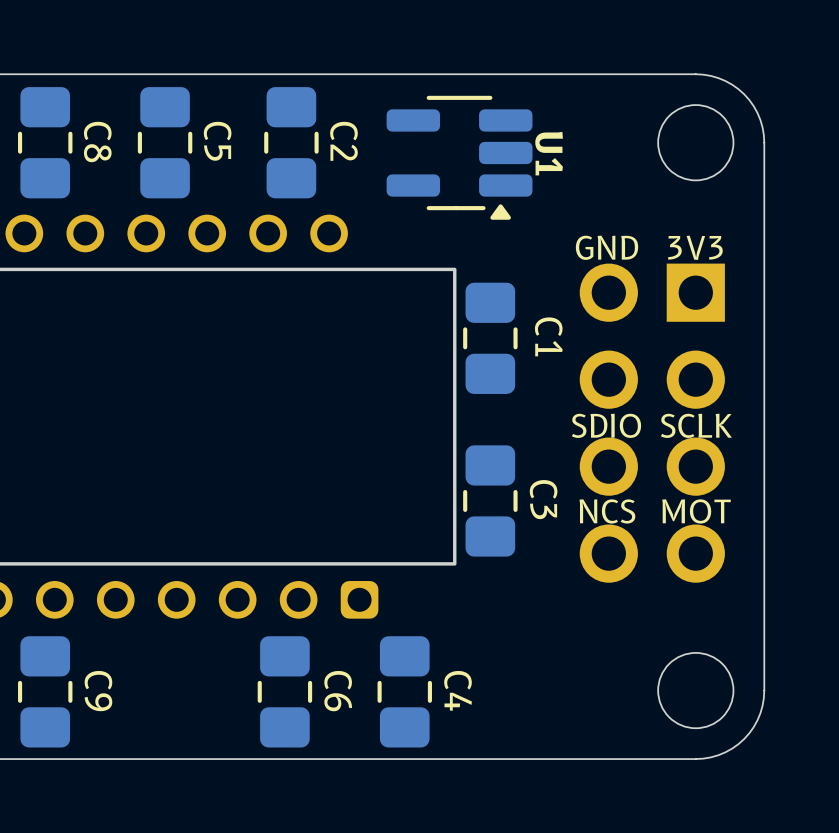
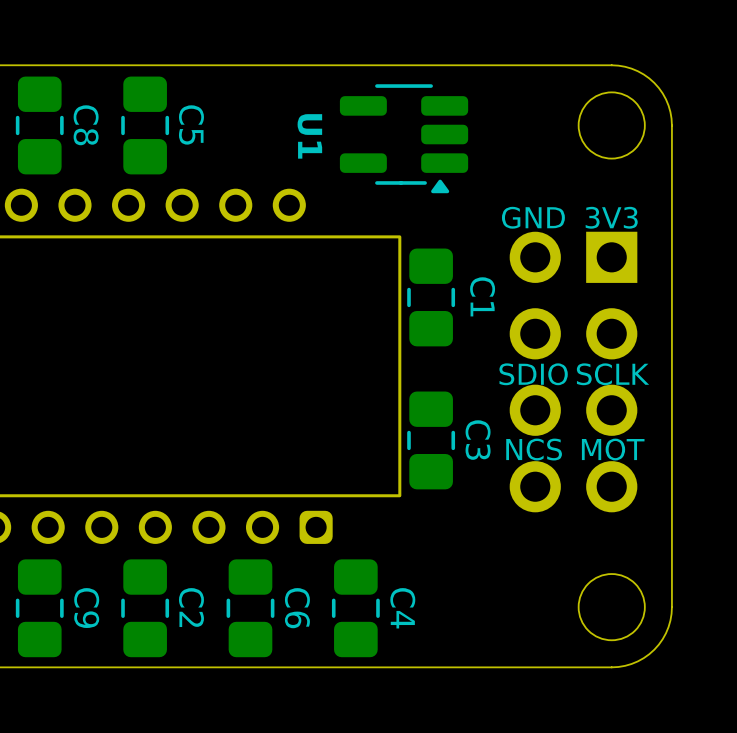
C2 position: (291, 142) -> (145, 608)
U1 name position: U1 (549, 153) -> U1 (309, 136)

